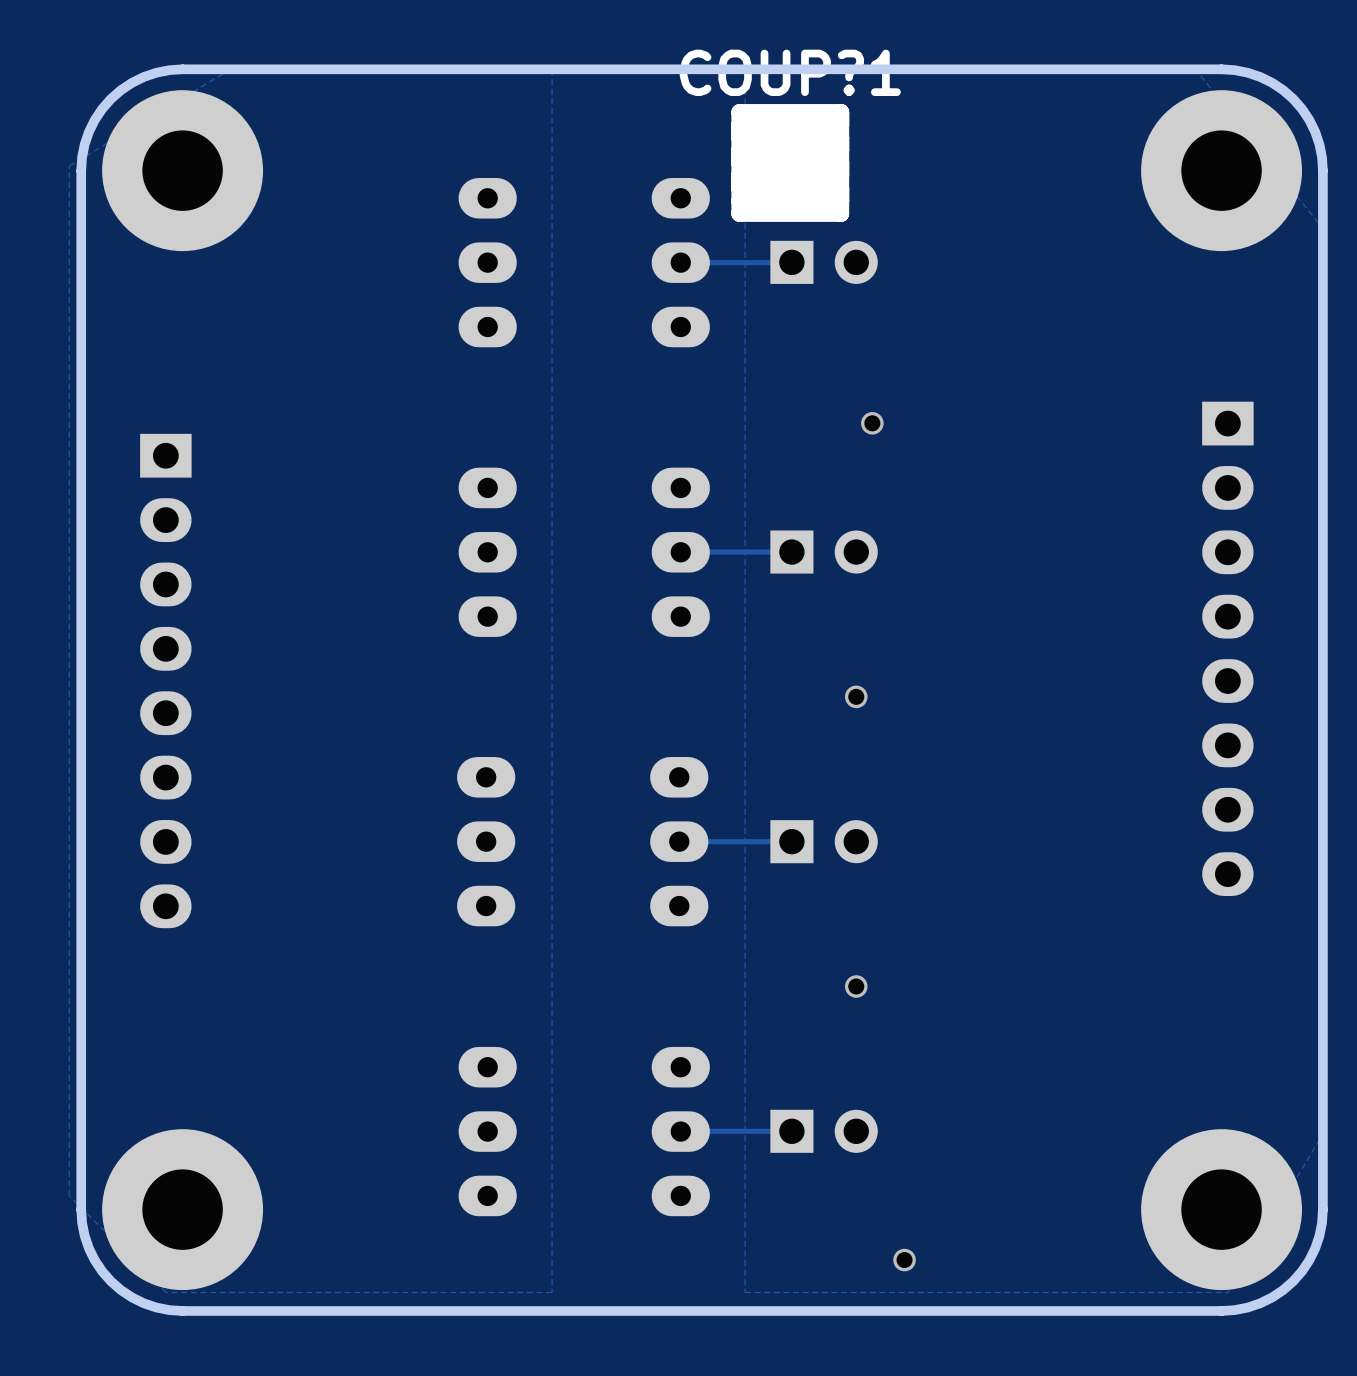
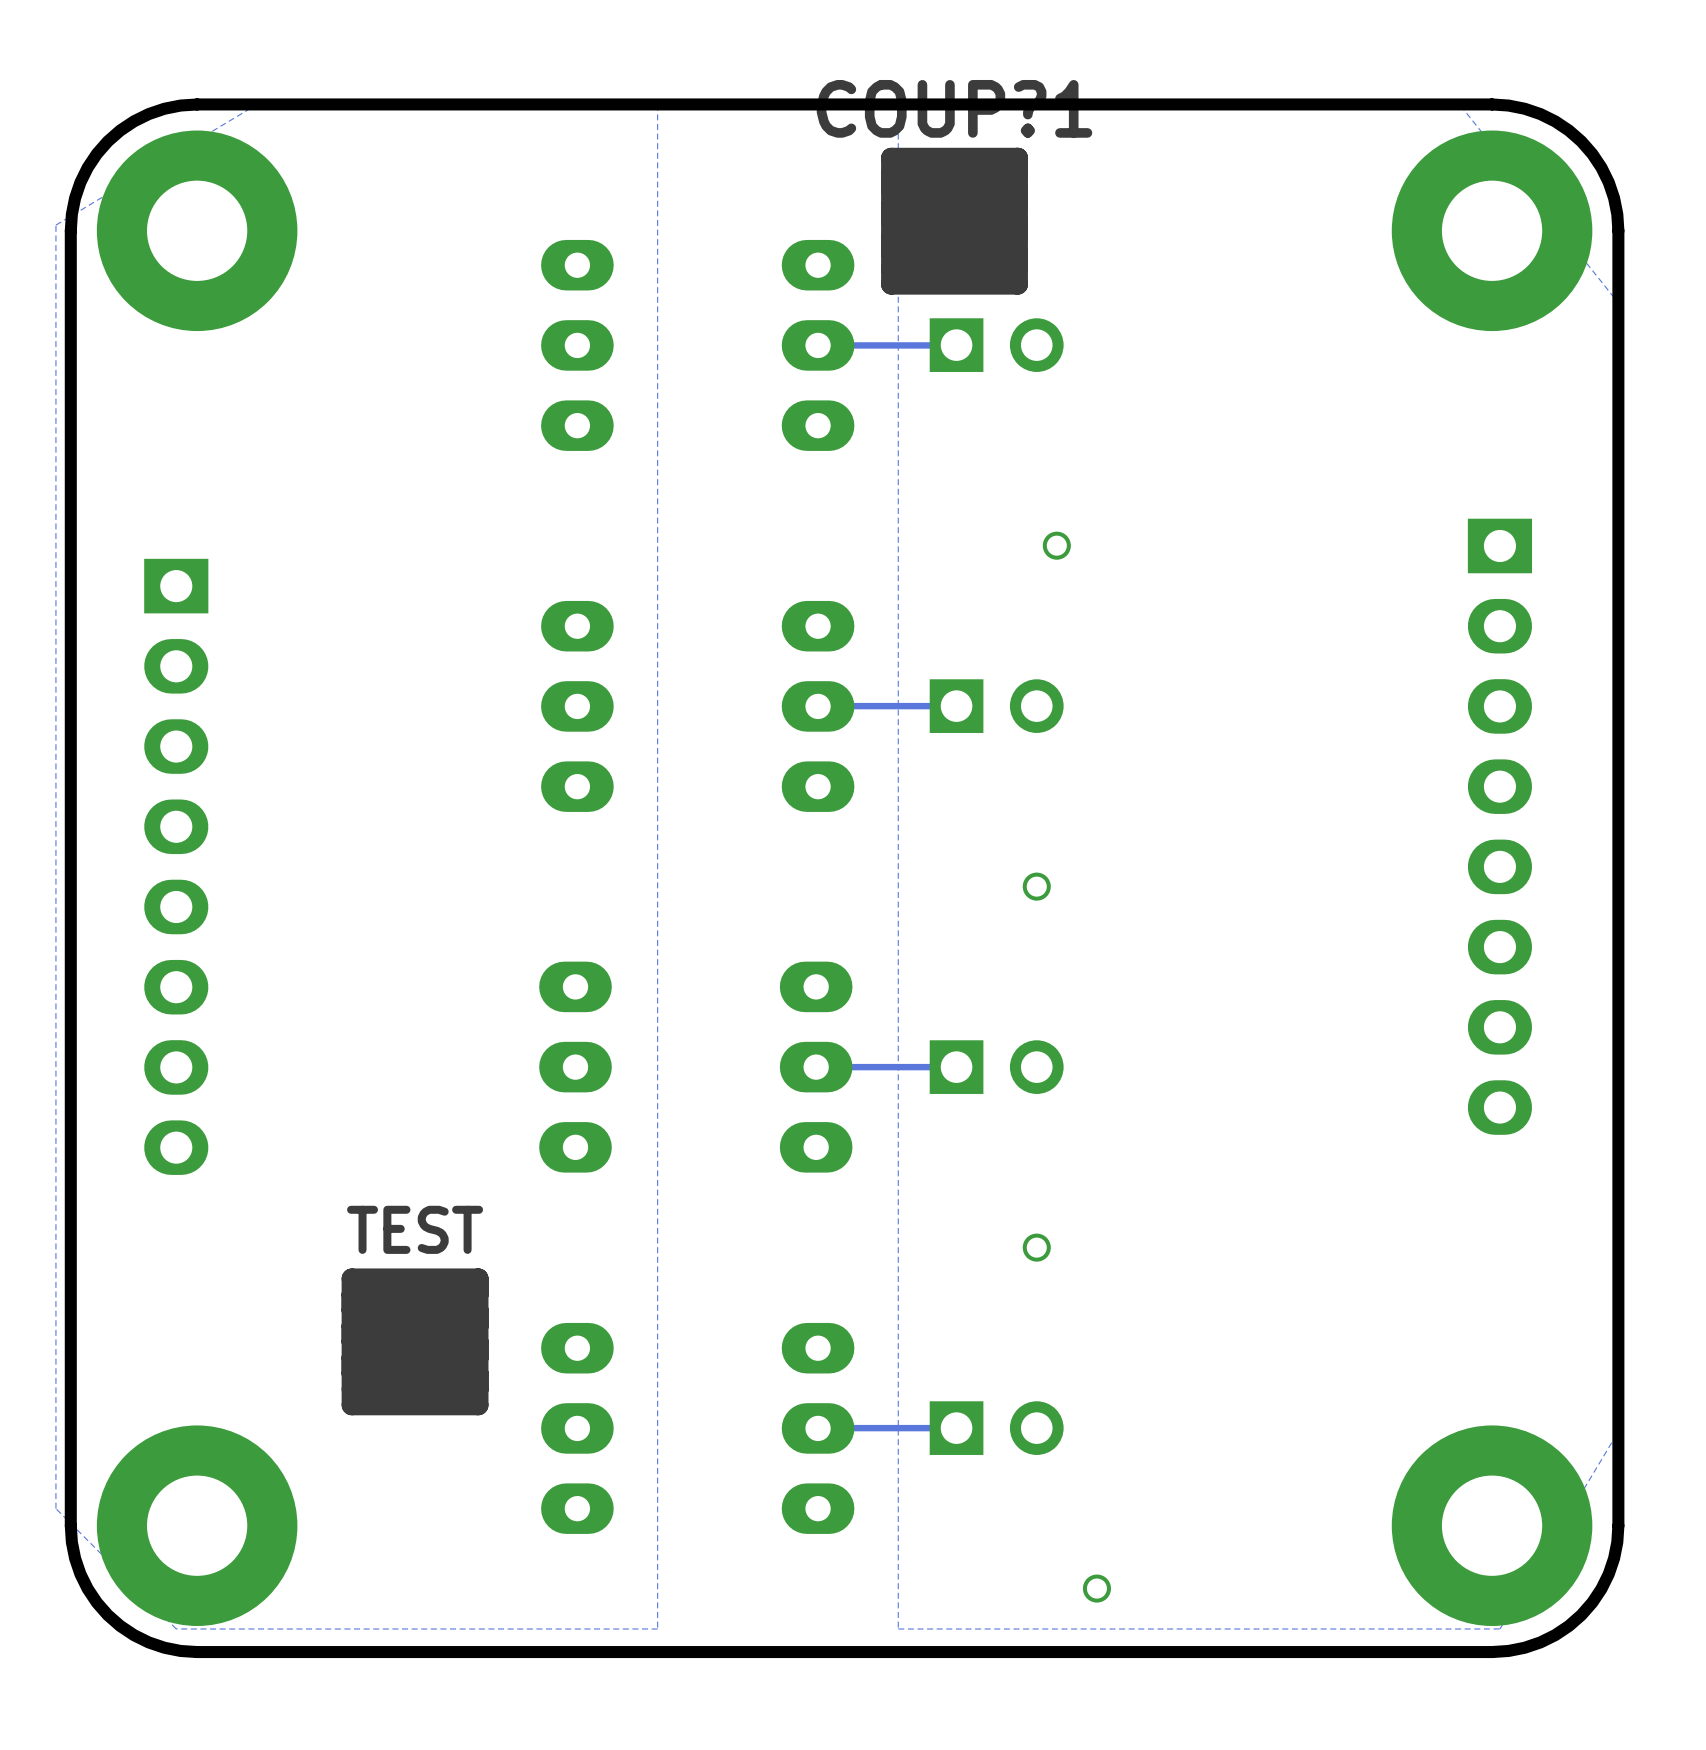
TEST: none -> (415, 1341)

